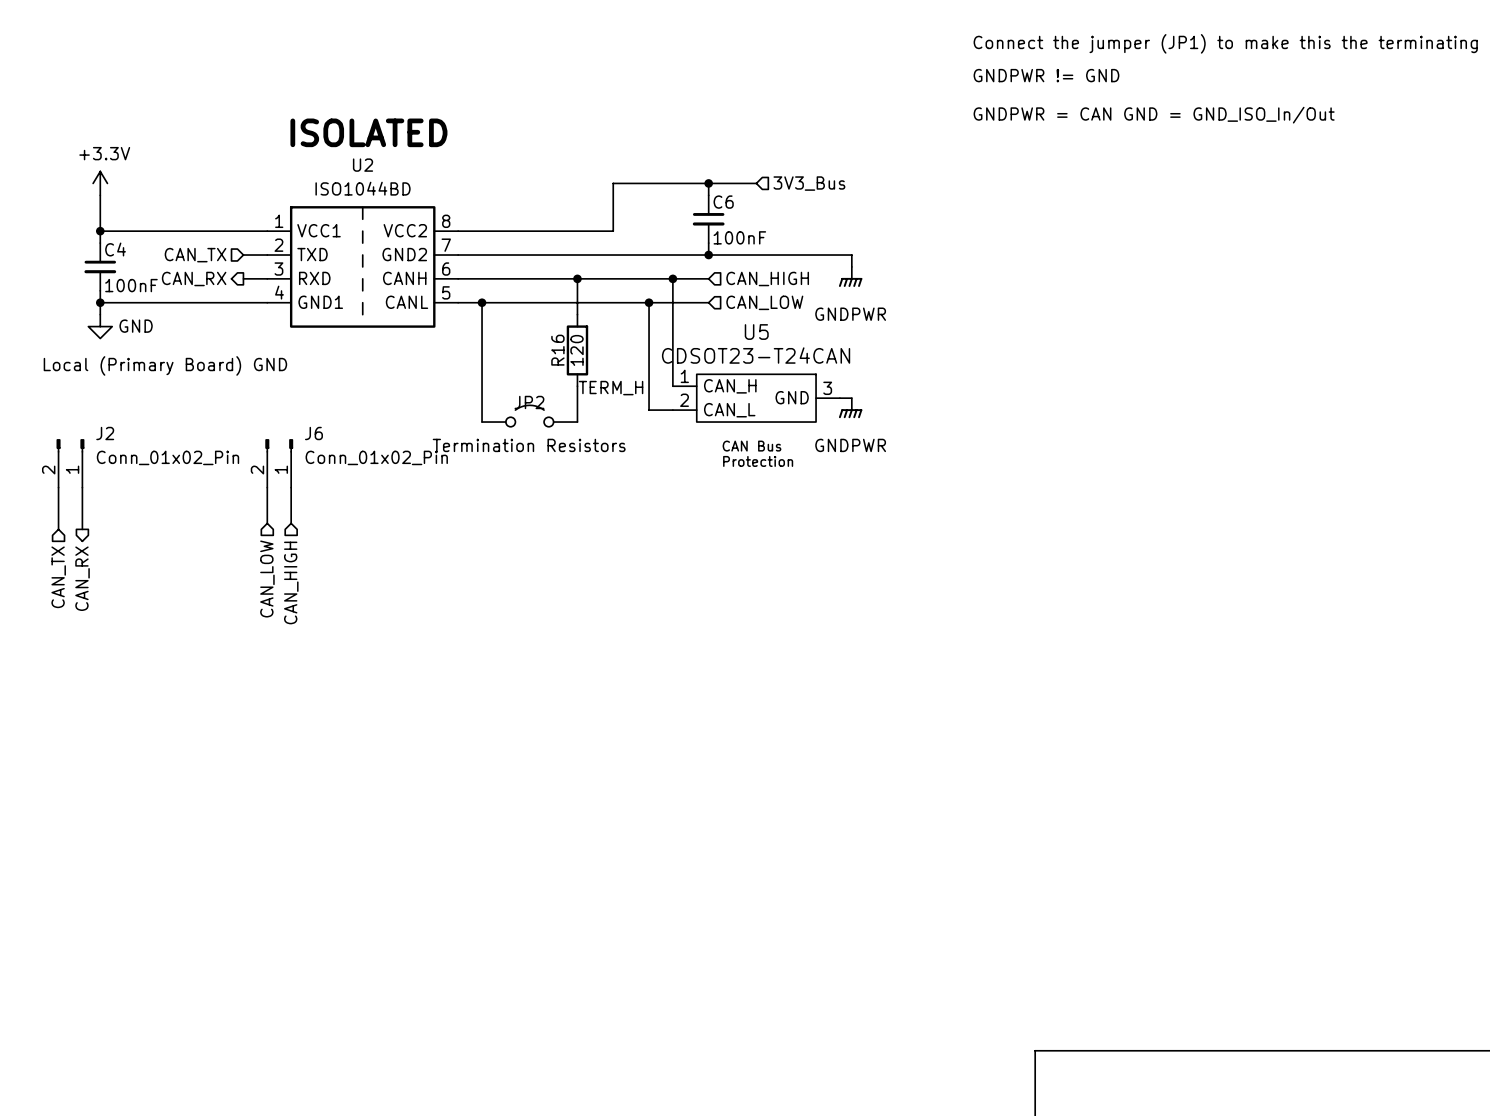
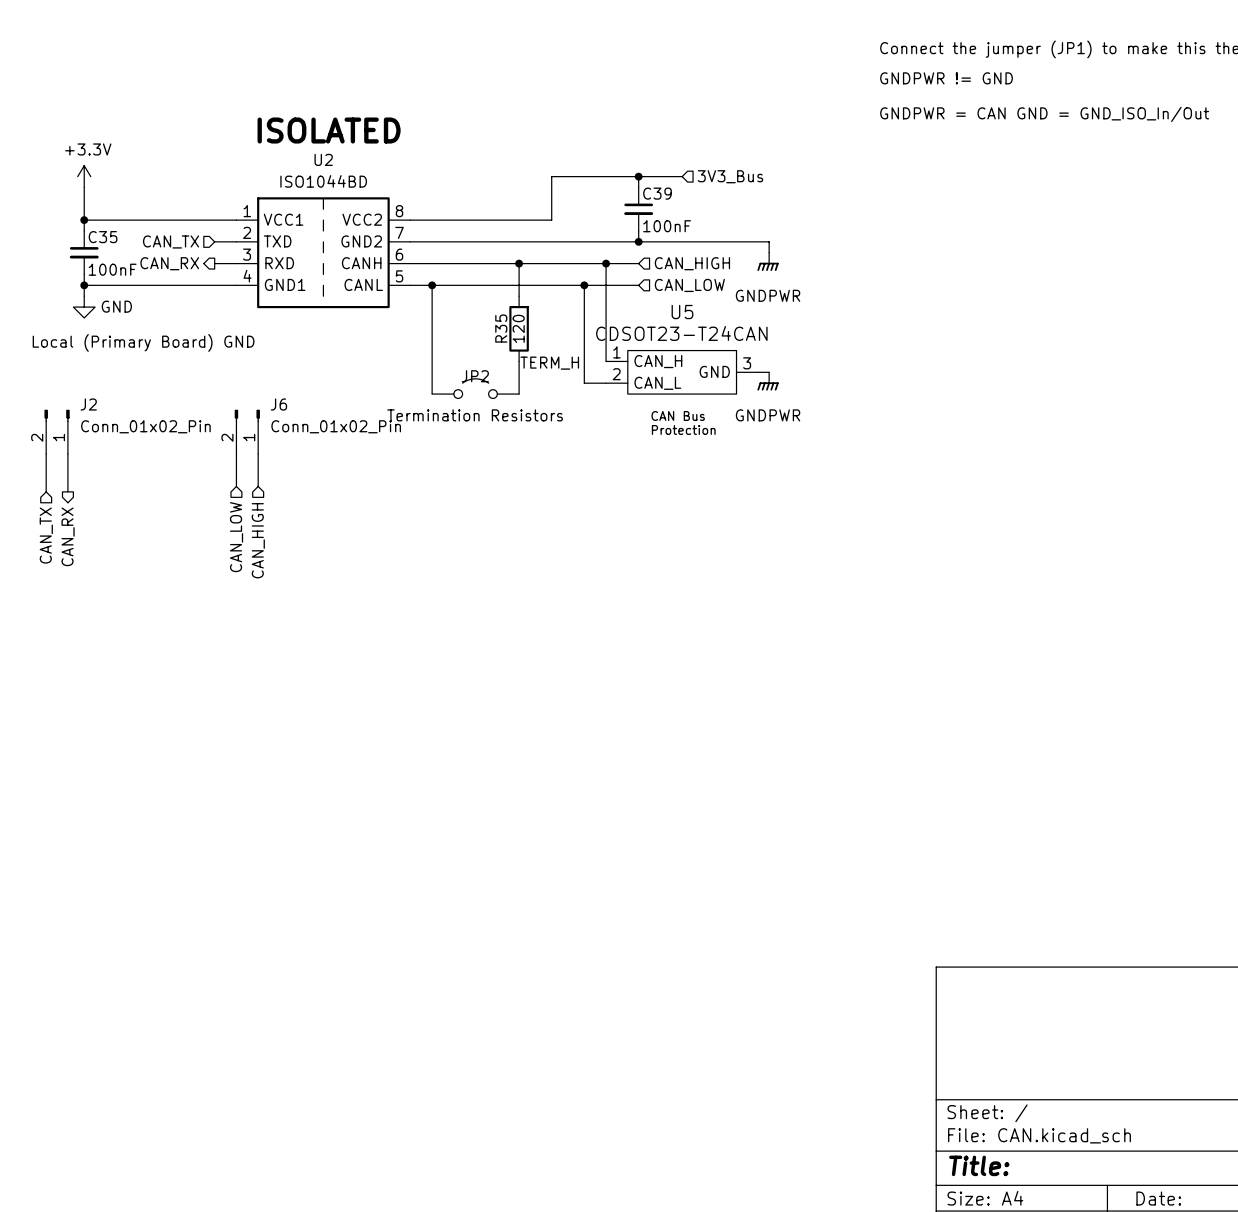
C6 name: C6 (723, 202) -> C39 (657, 193)
C4 name: C4 (115, 249) -> C35 (103, 237)
R16 name: R16 (557, 350) -> R35 (501, 328)

